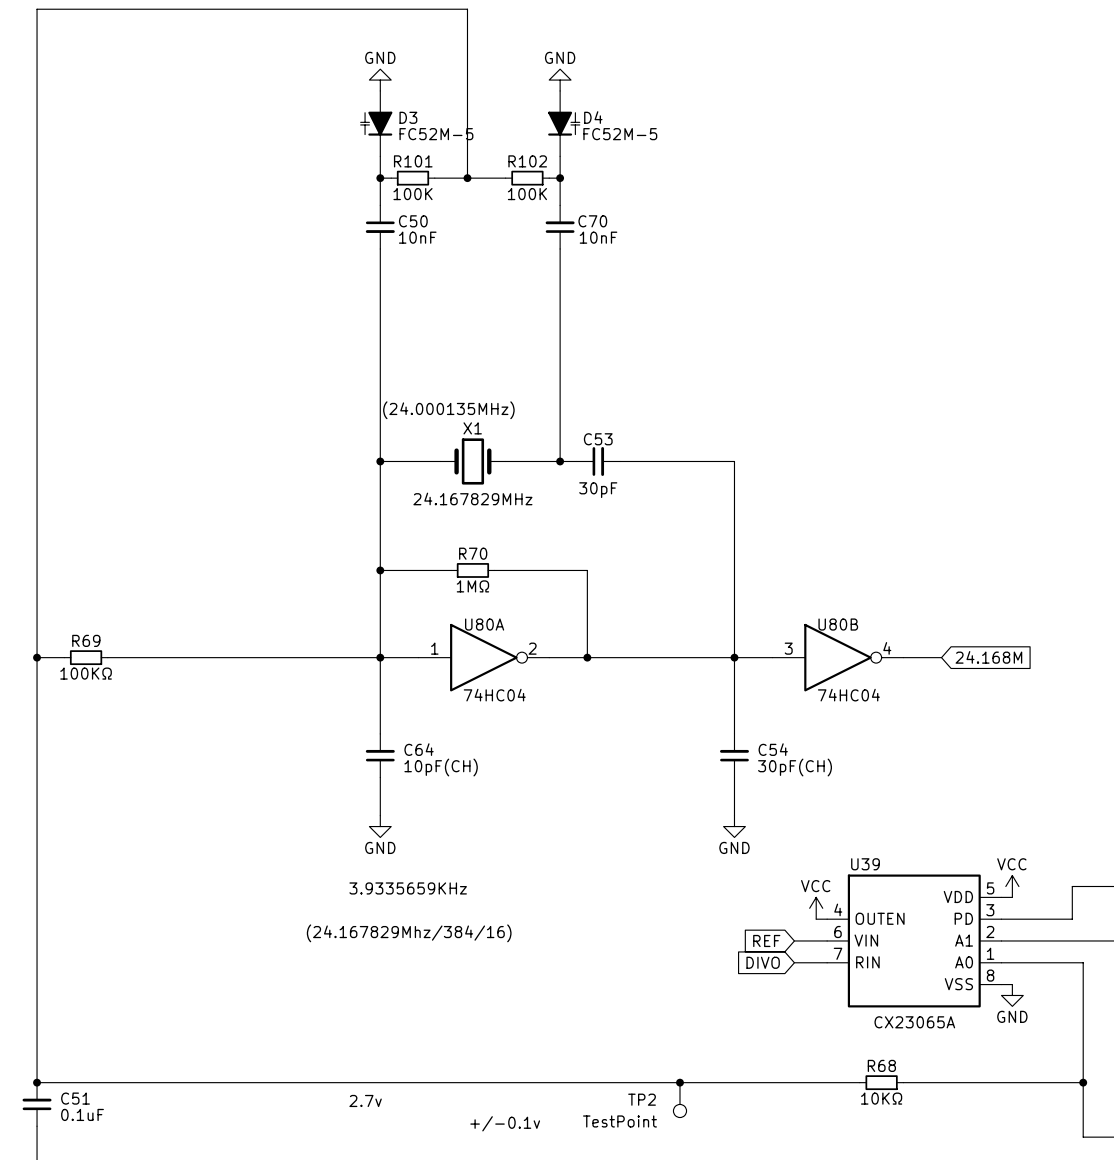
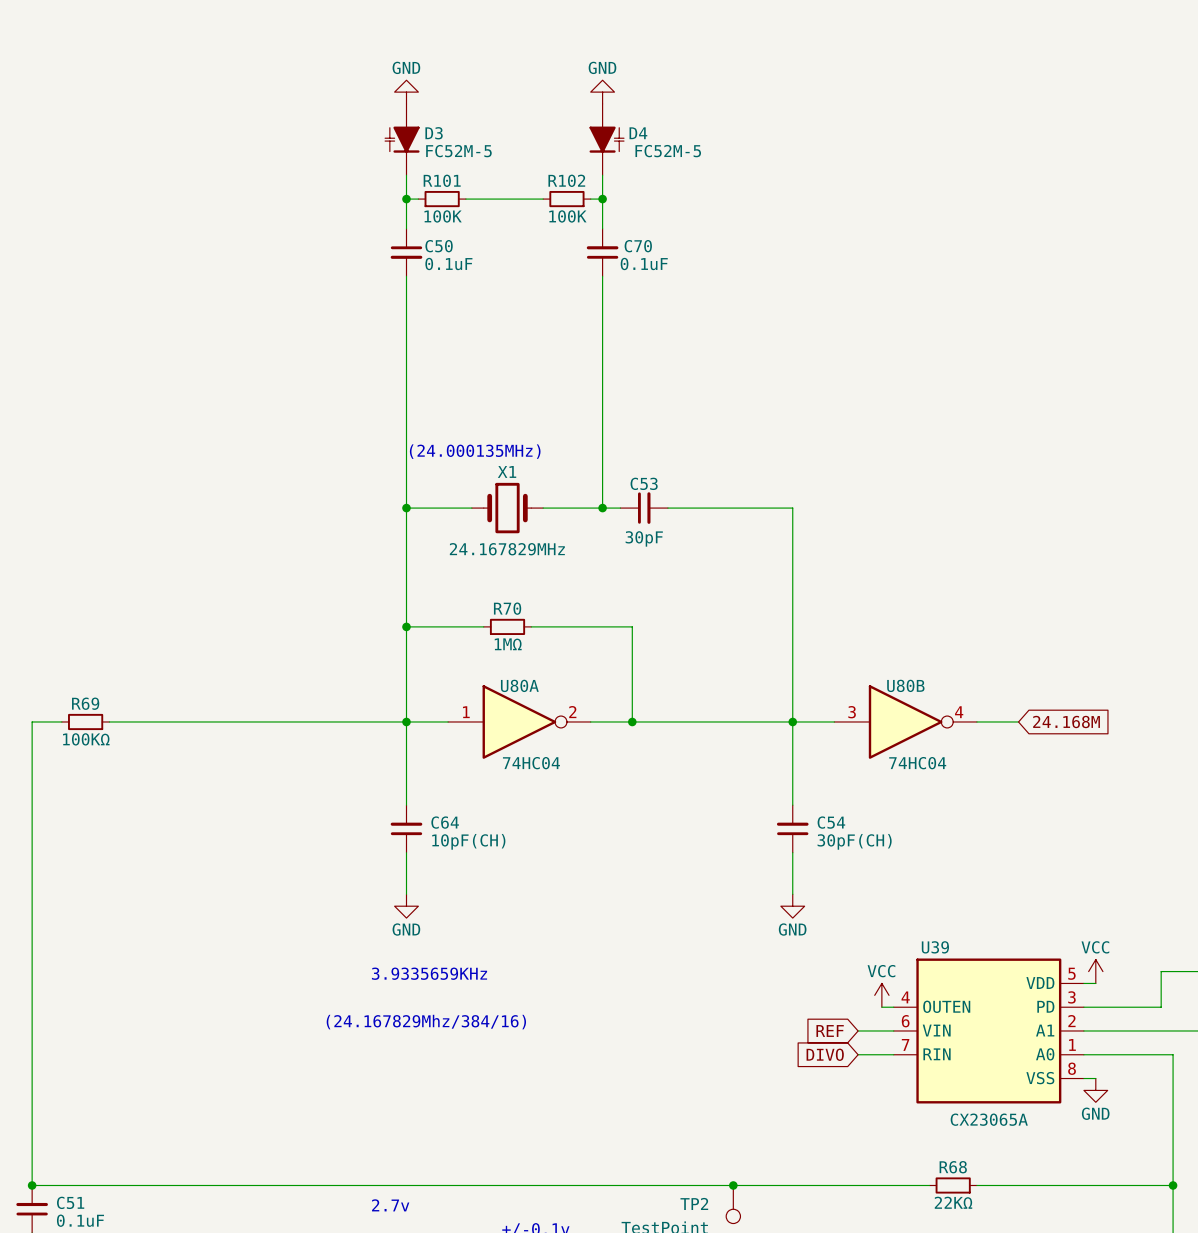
wire: (467, 178) (467, 9) (37, 9) (37, 657) -> none
junction: (467, 178) -> none
C50 value: 10nF (417, 237) -> 0.1uF (448, 263)
C70 value: 10nF (598, 237) -> 0.1uF (644, 263)
junction: (37, 657) -> none
R68 value: 10KΩ (881, 1098) -> 22KΩ (953, 1202)

